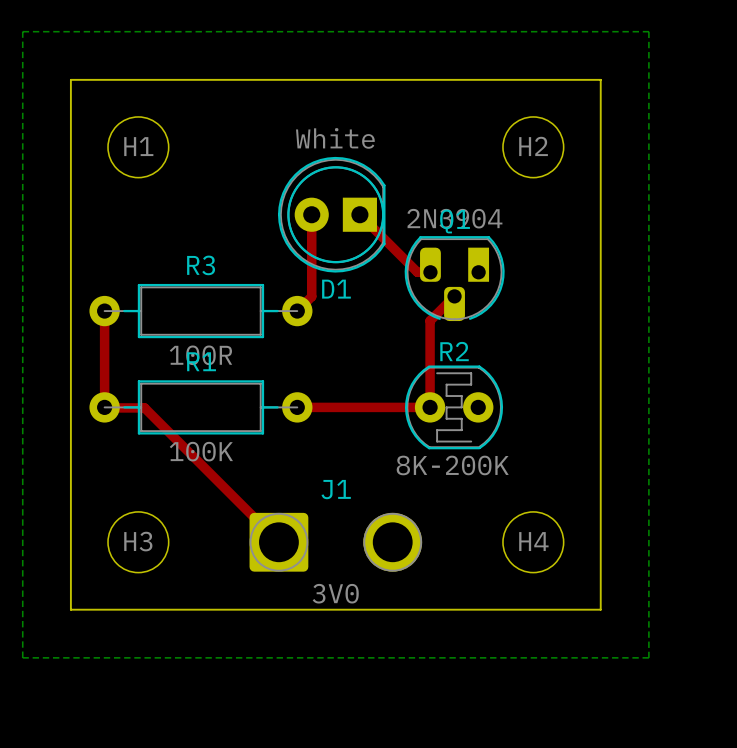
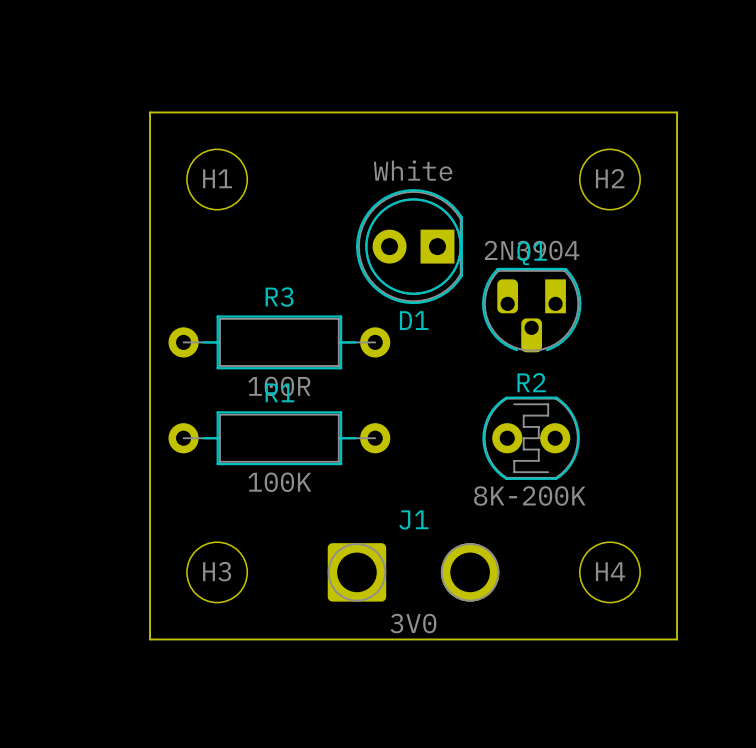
bottom zone outline: (22, 31) (22, 657) (648, 657) (648, 31) (22, 31) -> none
top track: (311, 214) (311, 296) (297, 311) -> none
top track: (359, 214) (417, 272) (430, 272) -> none
top track: (454, 296) (430, 320) (430, 407) (297, 407) -> none
top track: (104, 311) (104, 407) -> none
top track: (107, 407) (144, 407) (278, 542) -> none

